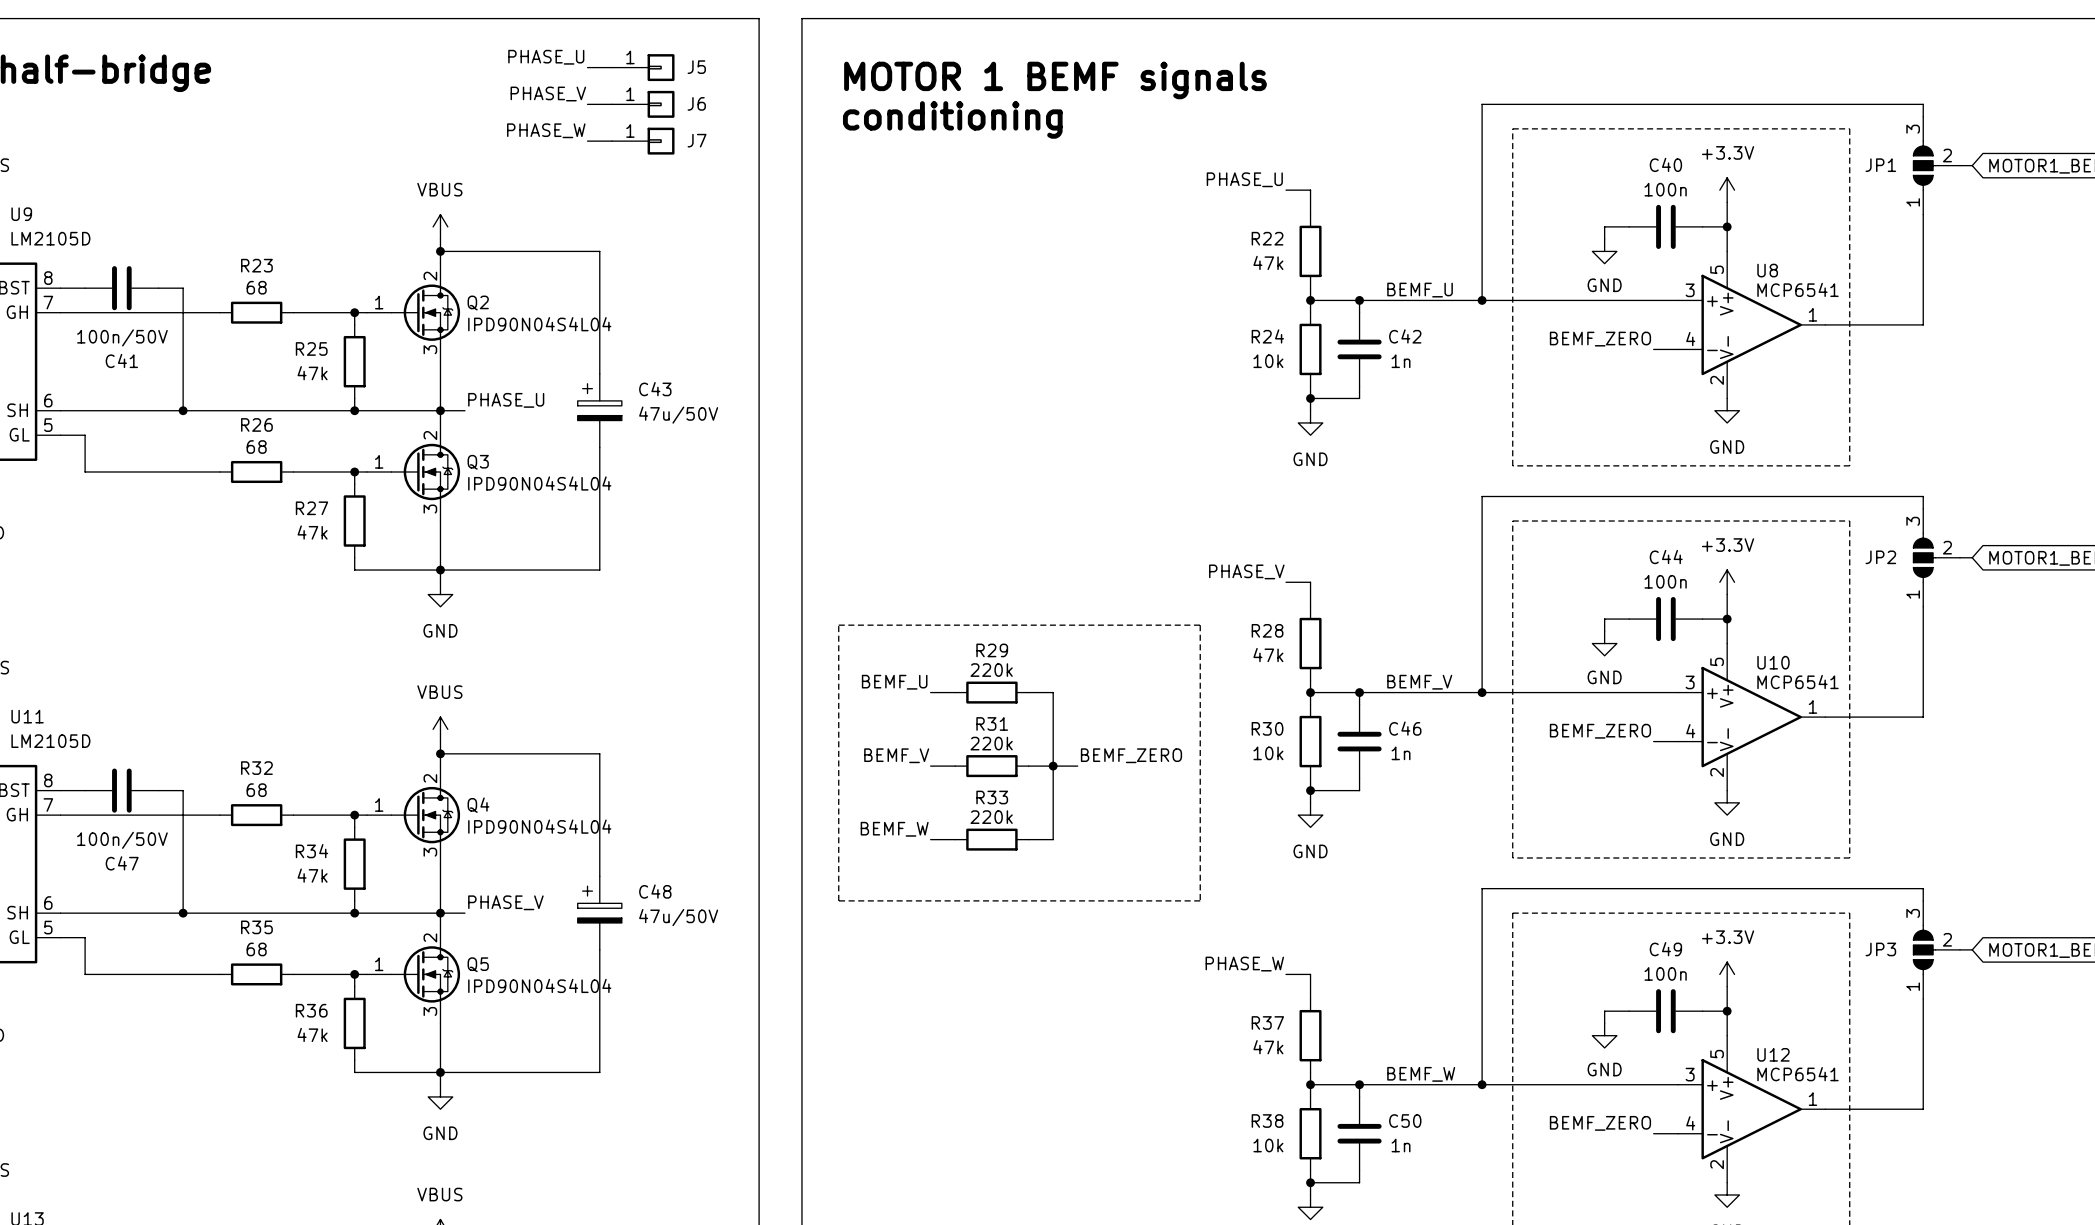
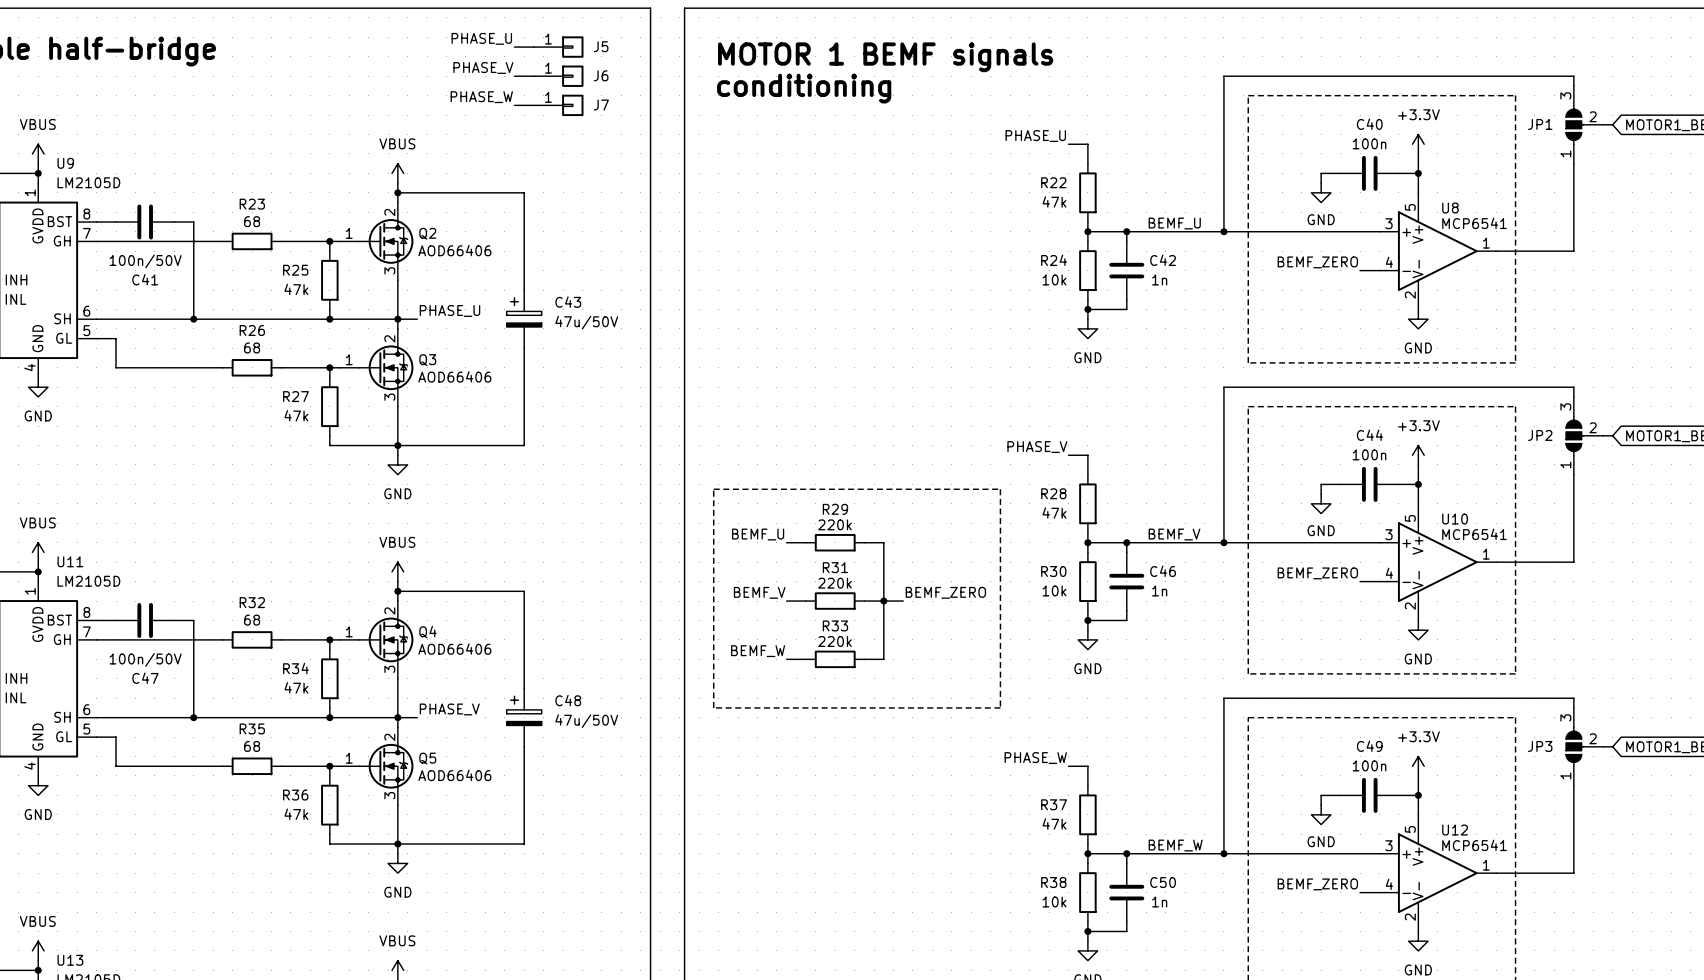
Q2 value: IPD90N04S4L04 (539, 324) -> AOD66406 (454, 250)
Q3 value: IPD90N04S4L04 (539, 483) -> AOD66406 (454, 376)
Q4 value: IPD90N04S4L04 (539, 826) -> AOD66406 (454, 649)
Q5 value: IPD90N04S4L04 (539, 985) -> AOD66406 (454, 775)

